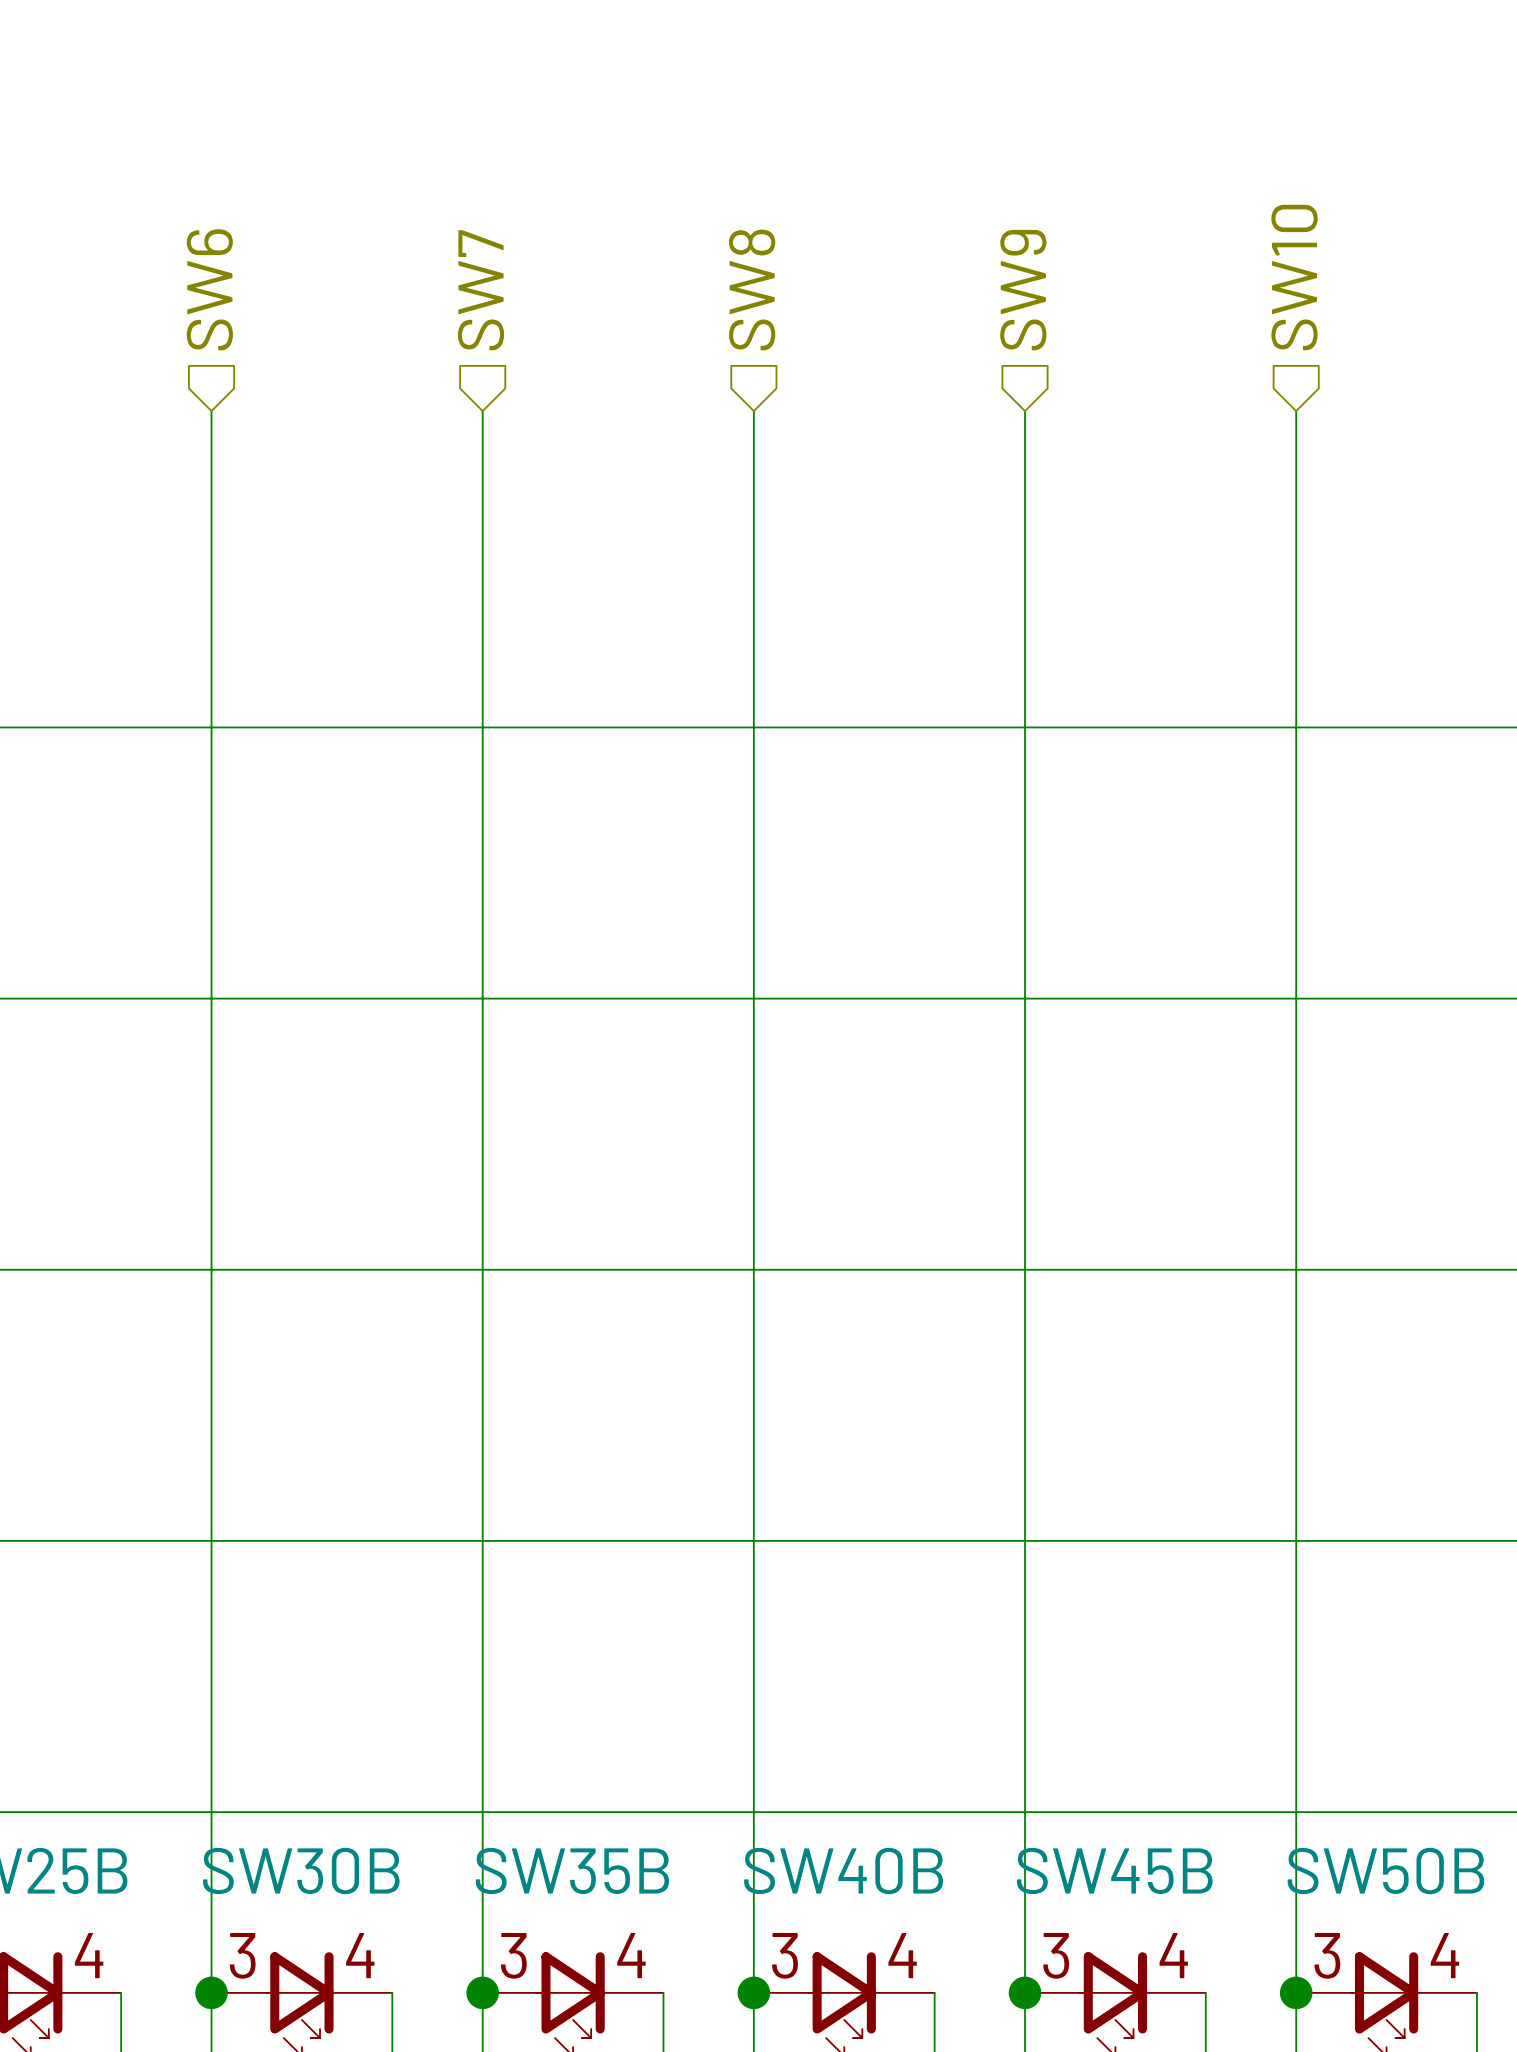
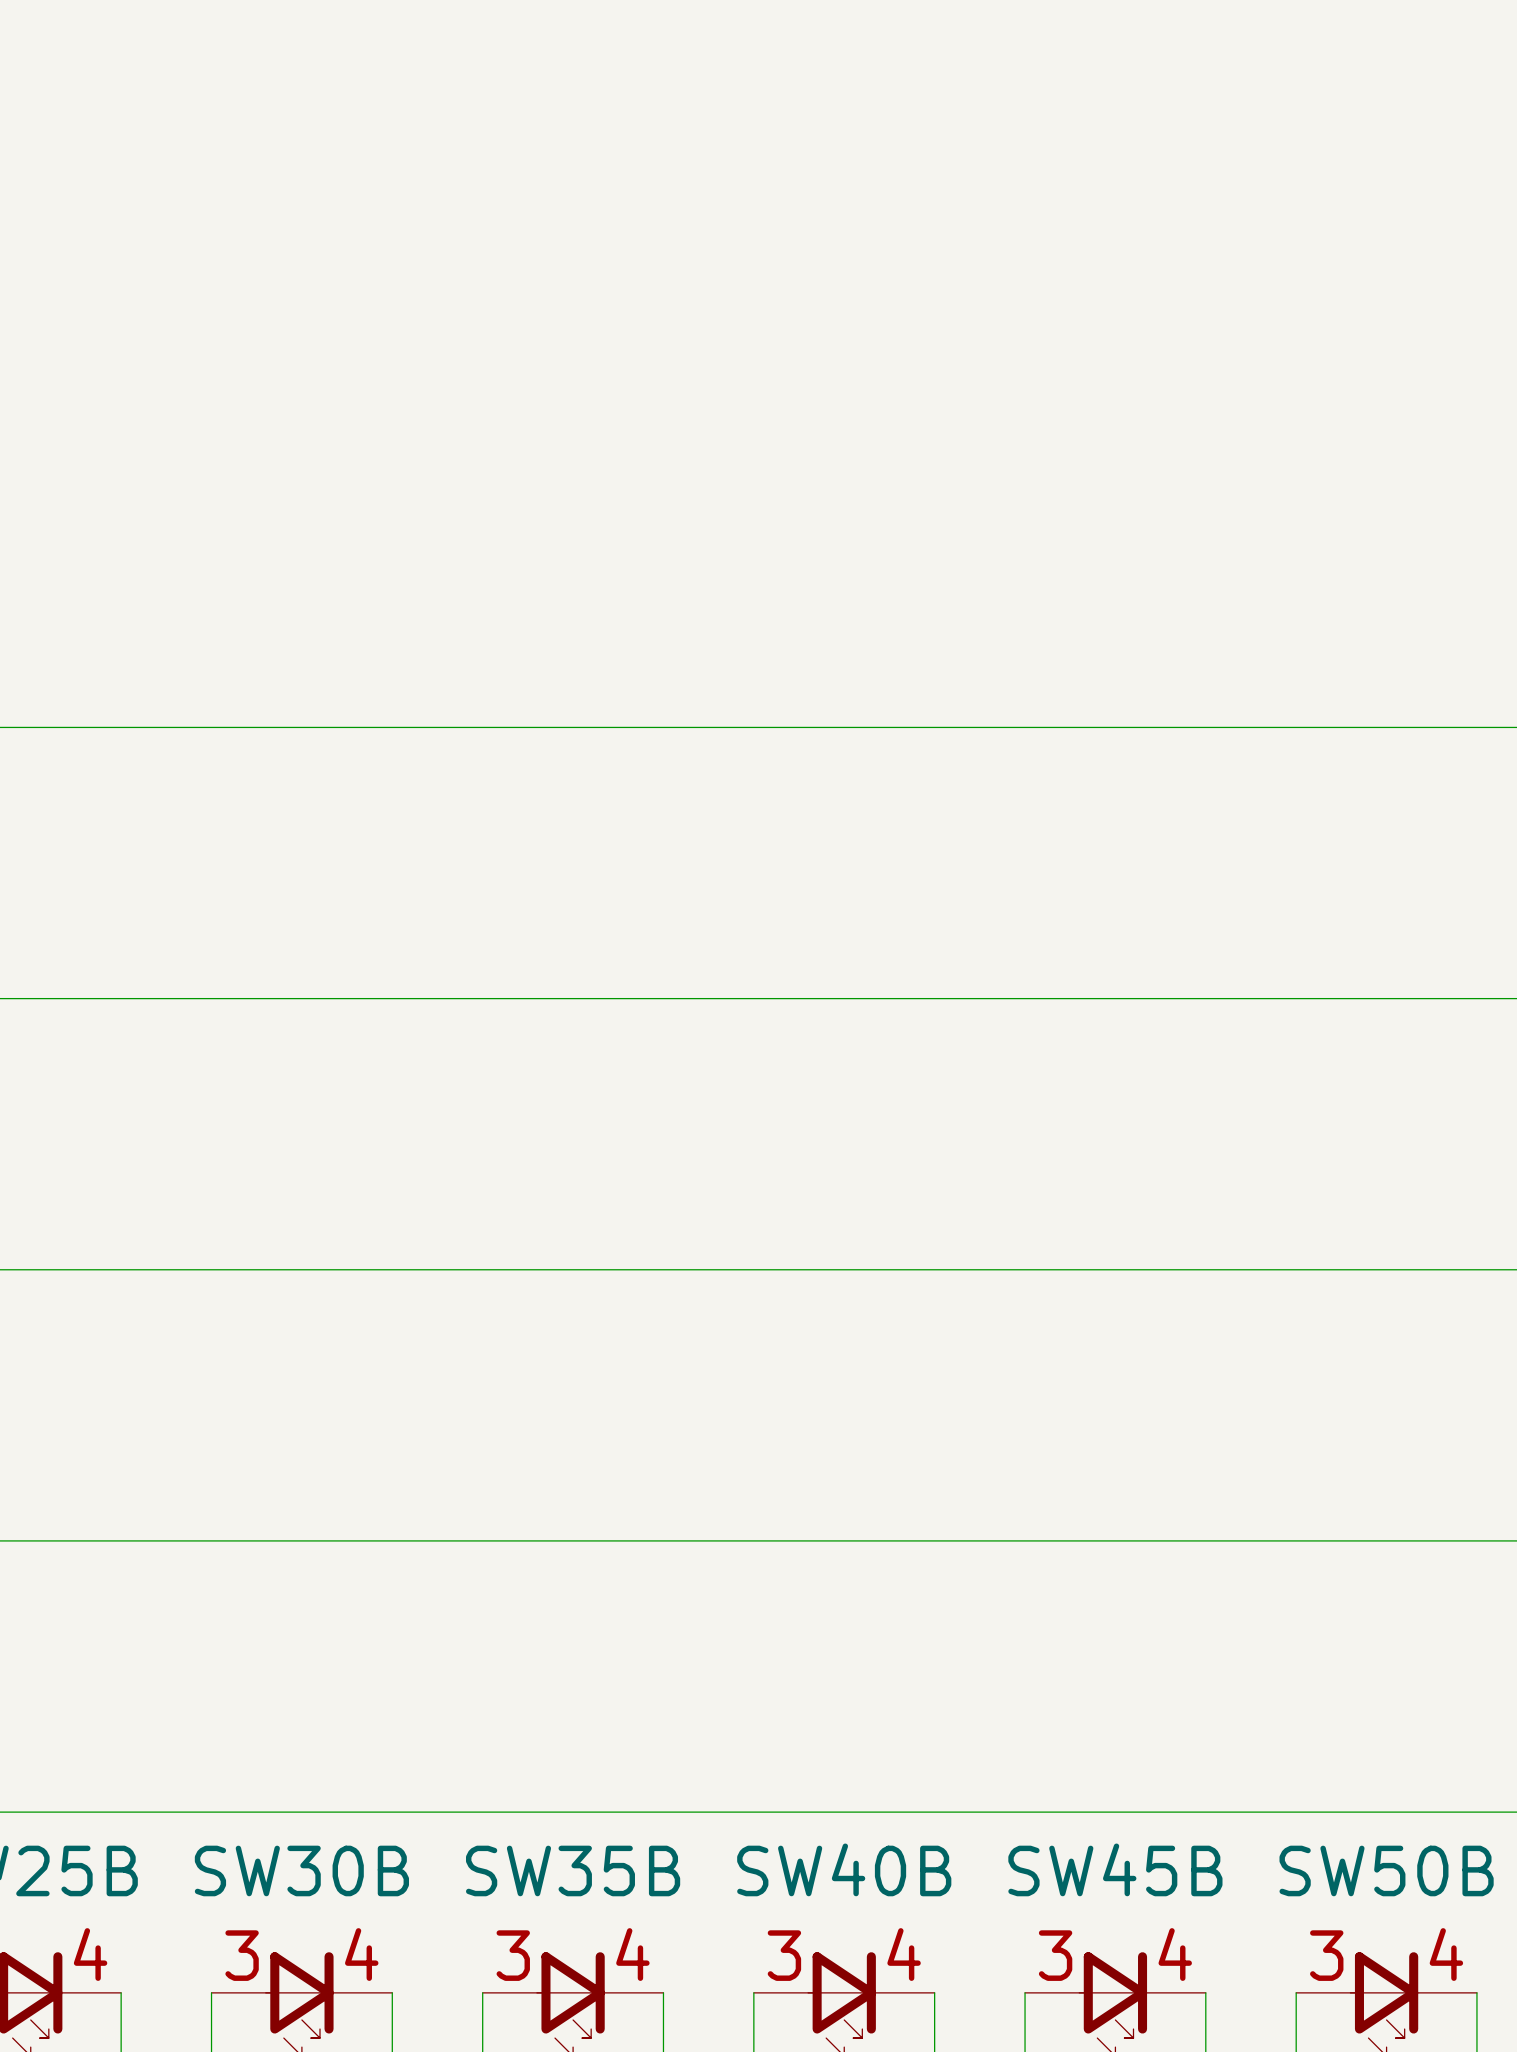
hierarchical label: SW10 (1294, 277) -> none
hierarchical label: SW6 (209, 289) -> none
hierarchical label: SW8 (752, 289) -> none
hierarchical label: SW7 (481, 290) -> none
hierarchical label: SW9 (1023, 290) -> none
wire: (211, 411) (211, 1992) -> none
wire: (482, 411) (482, 1992) -> none
wire: (753, 411) (753, 1992) -> none
wire: (1025, 411) (1025, 1992) -> none
wire: (1296, 411) (1296, 1992) -> none
junction: (211, 1992) -> none
junction: (482, 1992) -> none
junction: (753, 1992) -> none
junction: (1025, 1992) -> none
junction: (1296, 1992) -> none

